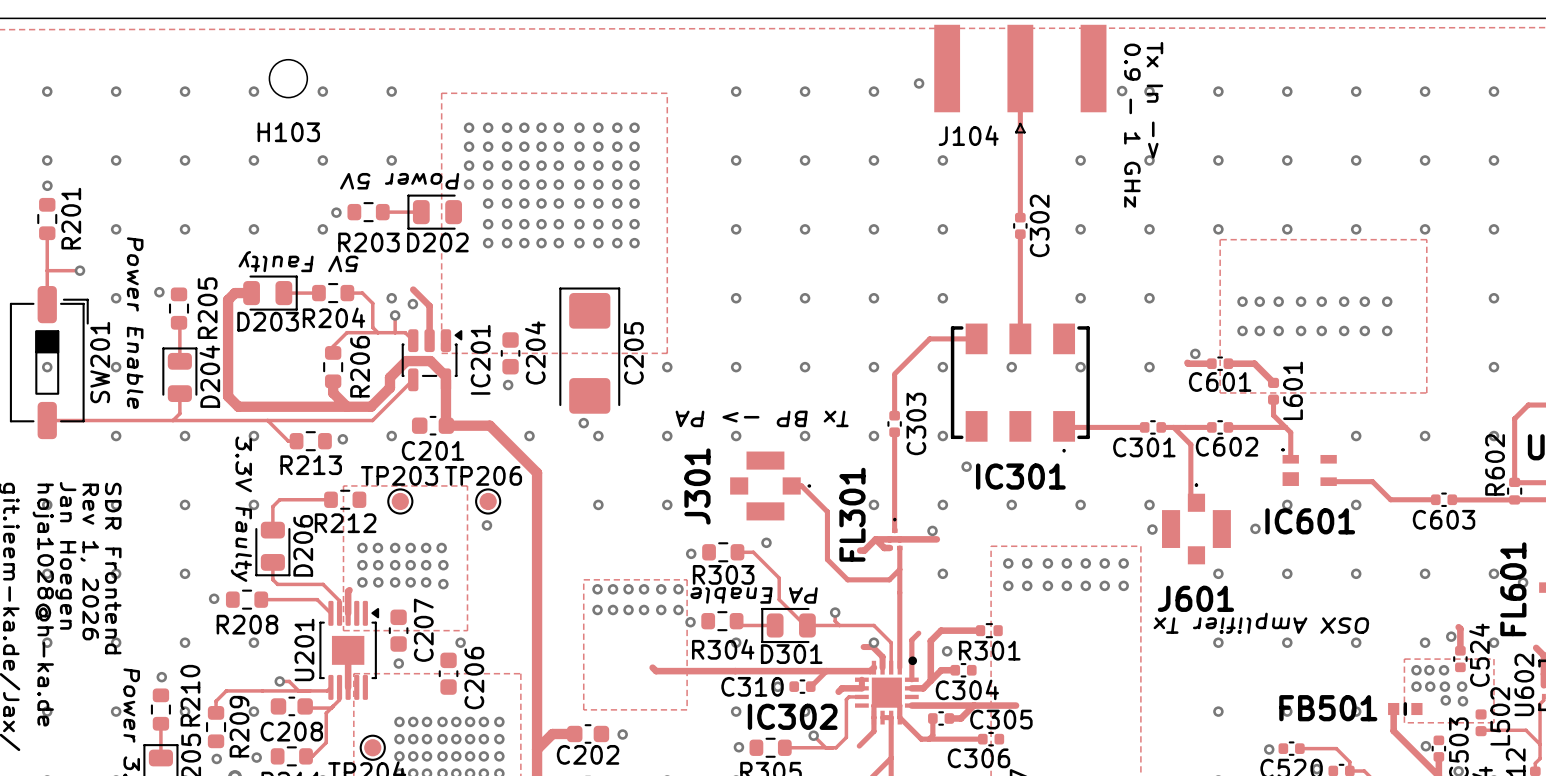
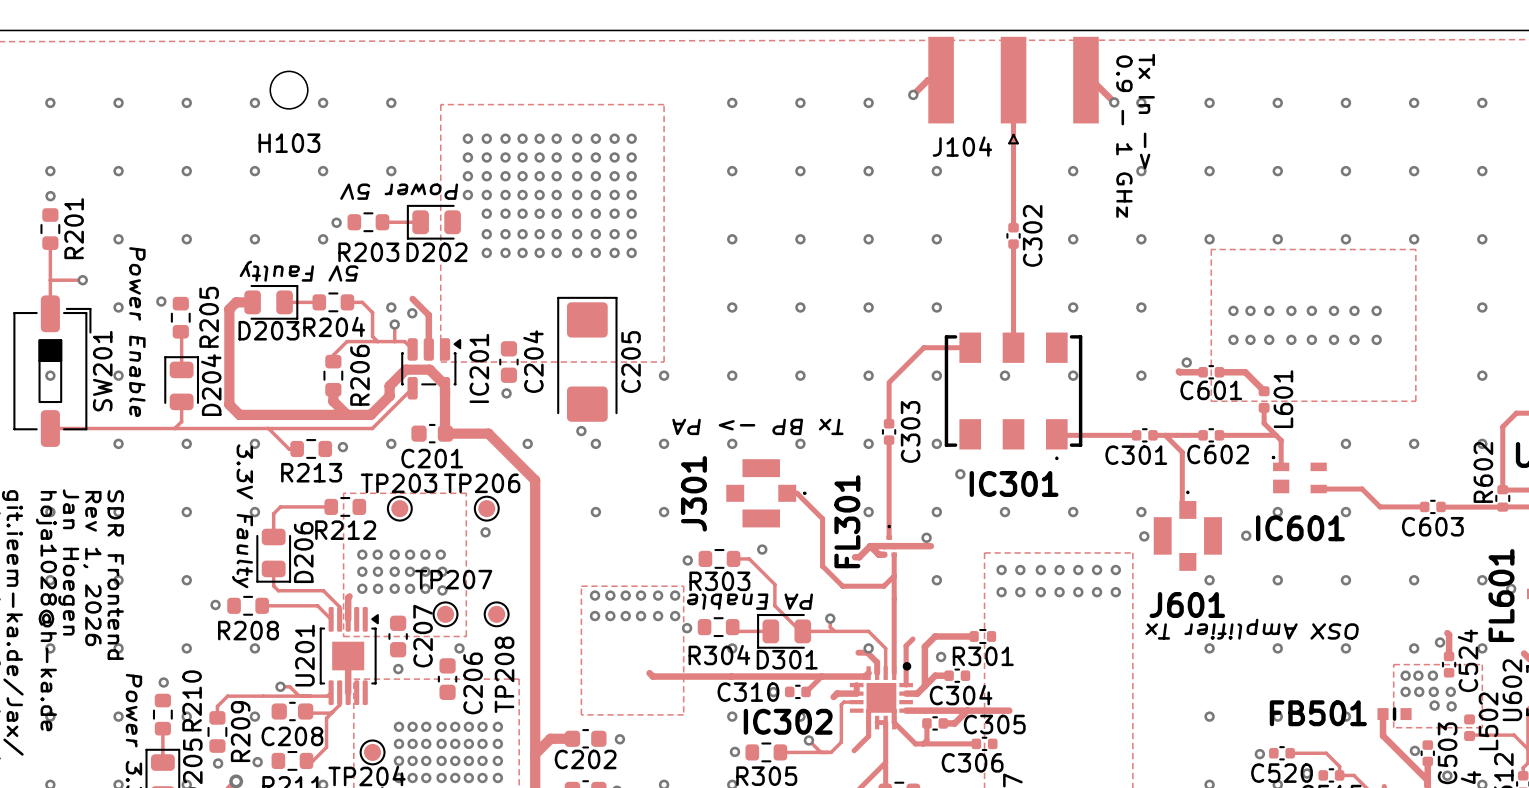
track: none -> (941, 80) (928, 80) (913, 94)
track: none -> (1085, 80) (1091, 80) (1114, 102)
TP207: none -> (445, 614)
TP208: none -> (496, 614)

